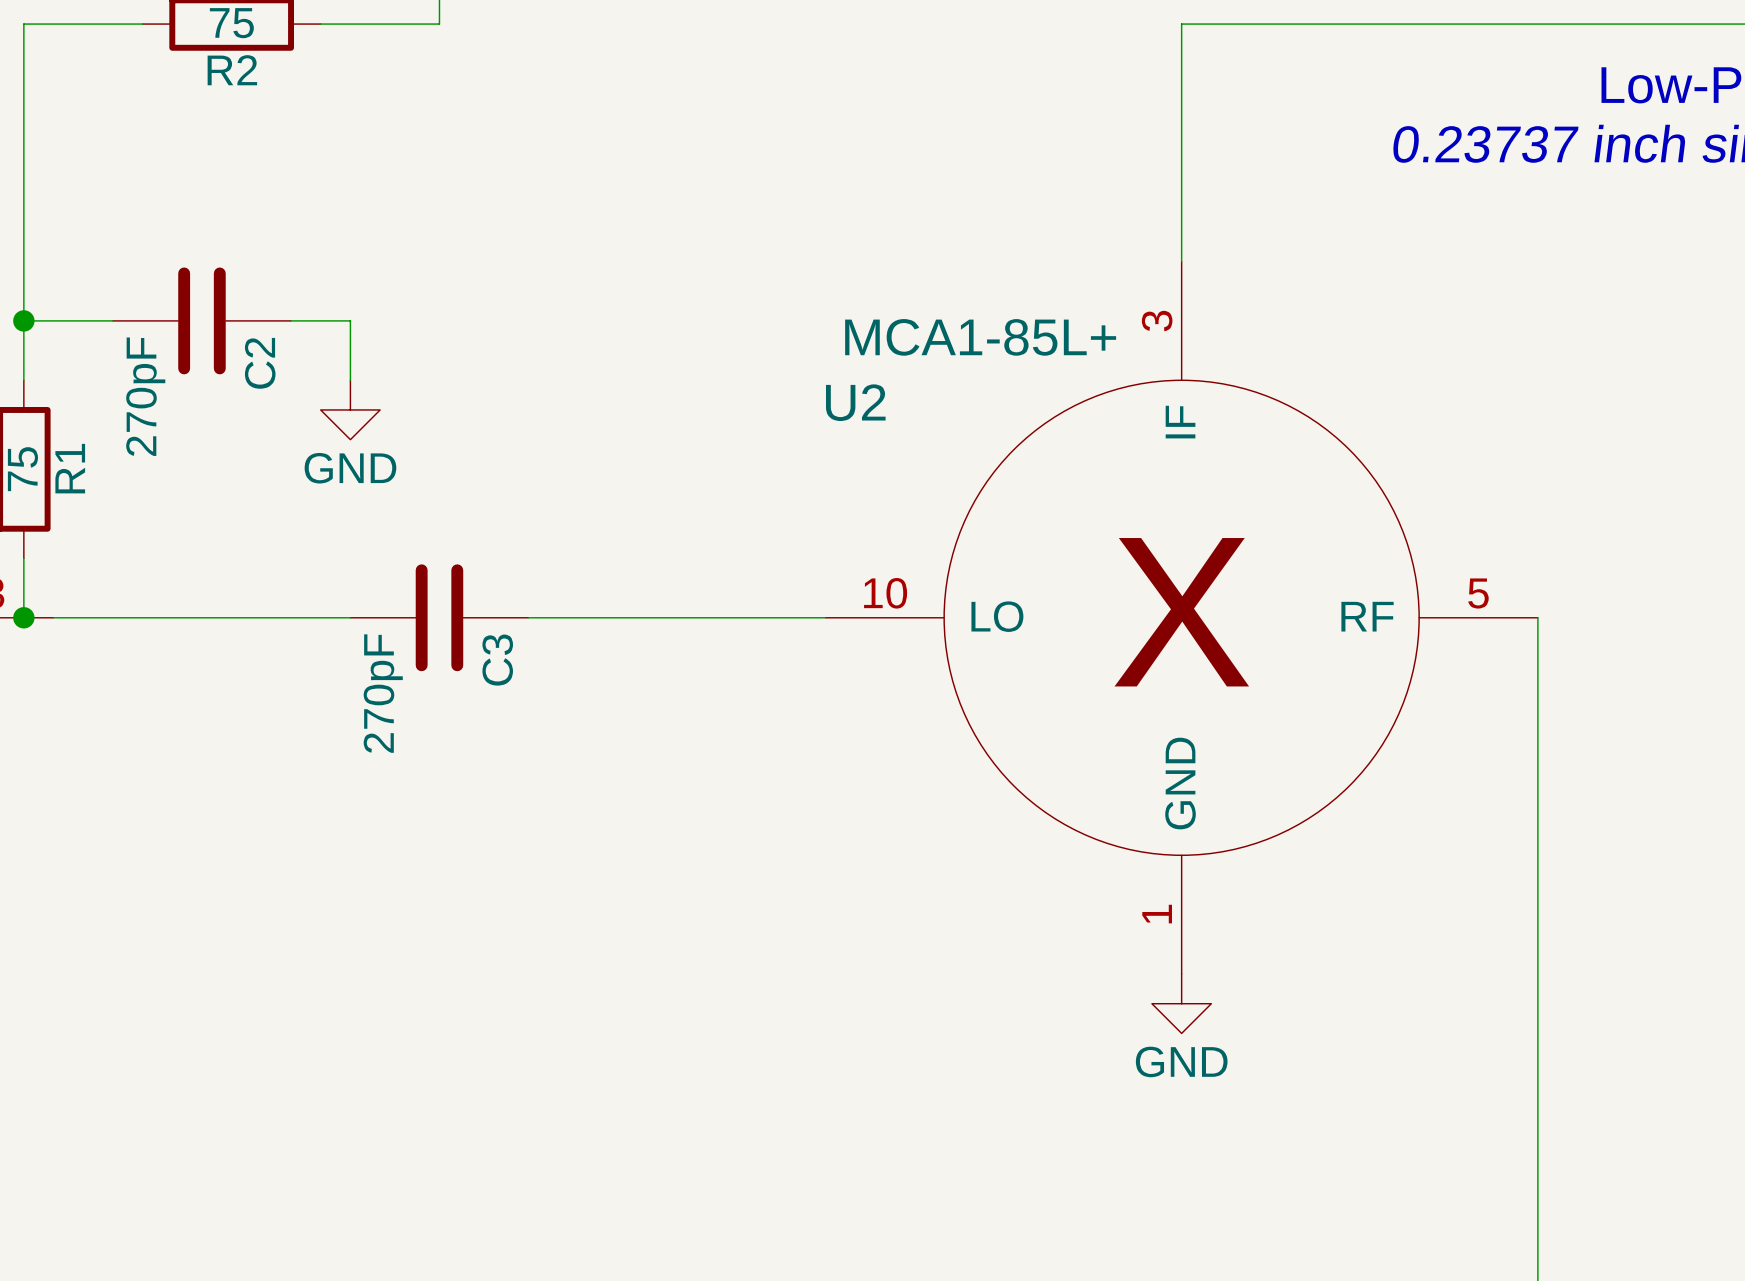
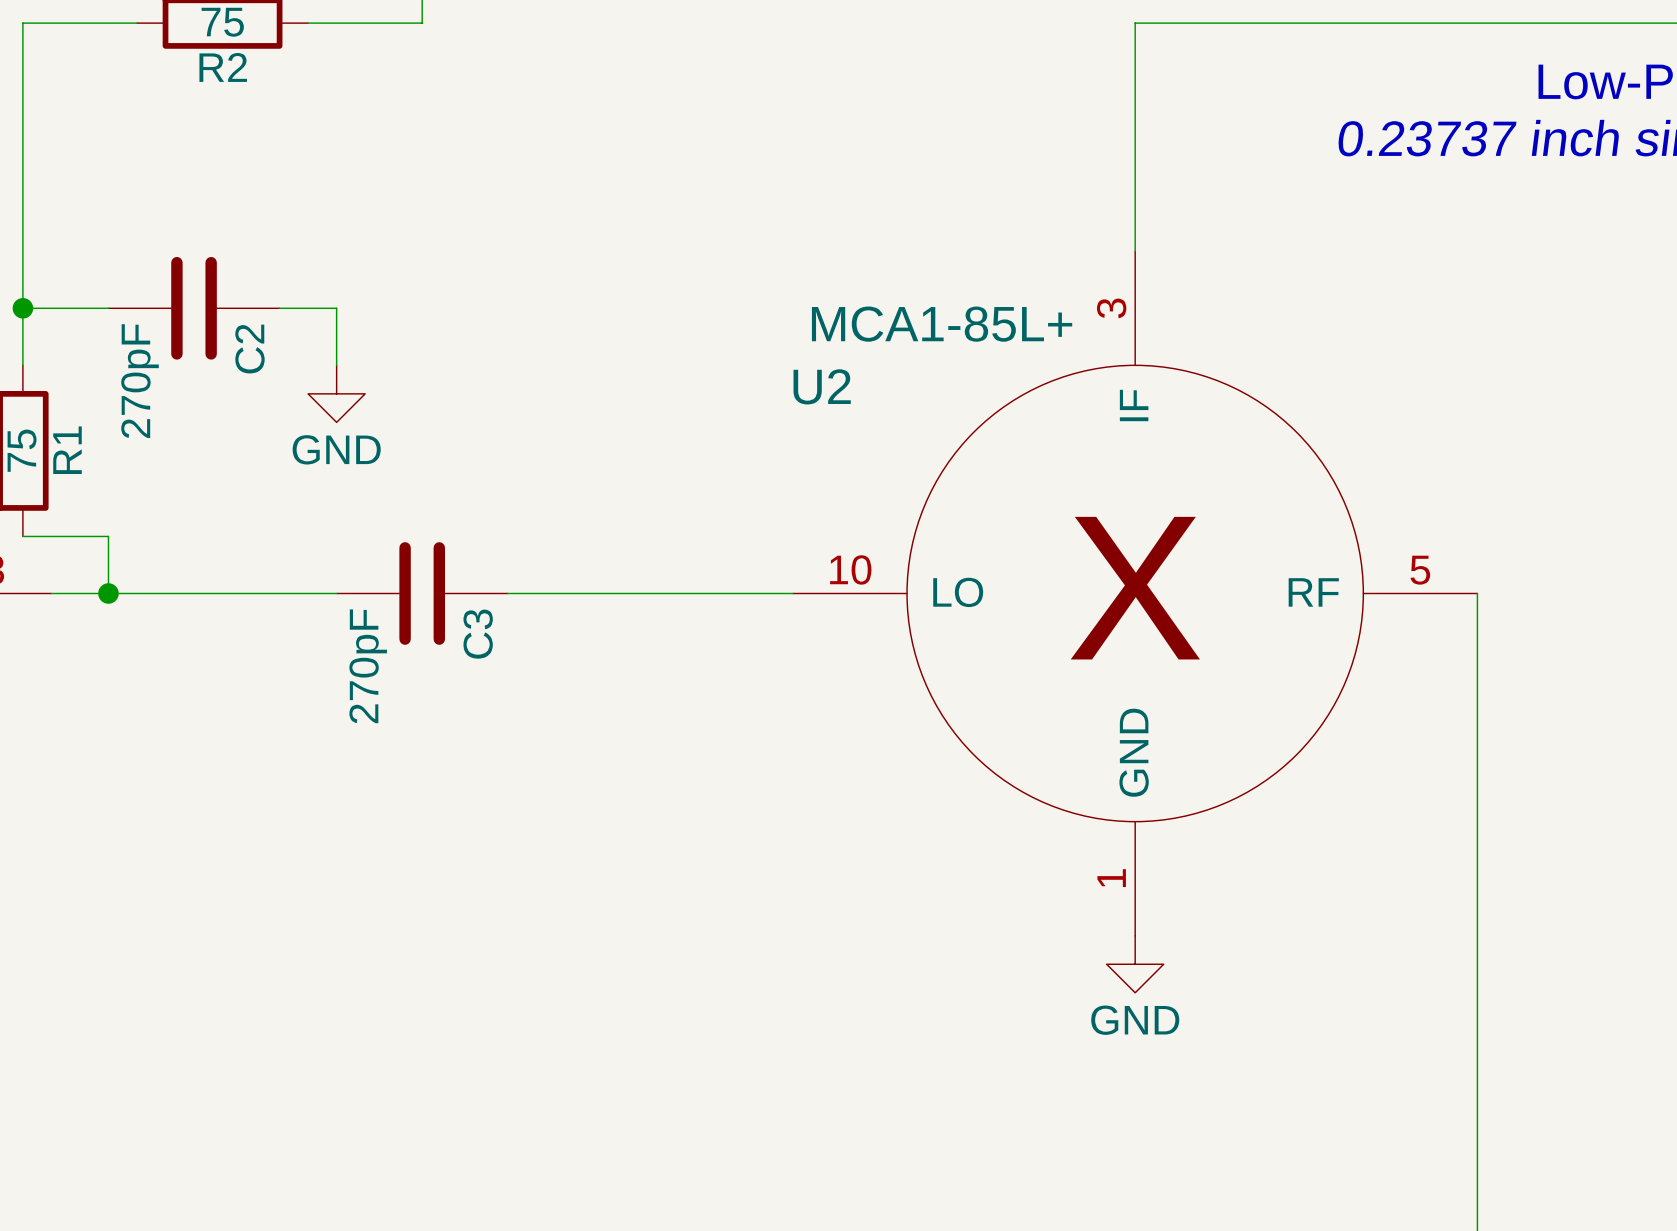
wire: (23, 558) (23, 617) -> (22, 536) (108, 536) (108, 593)
junction position: (23, 617) -> (108, 593)

